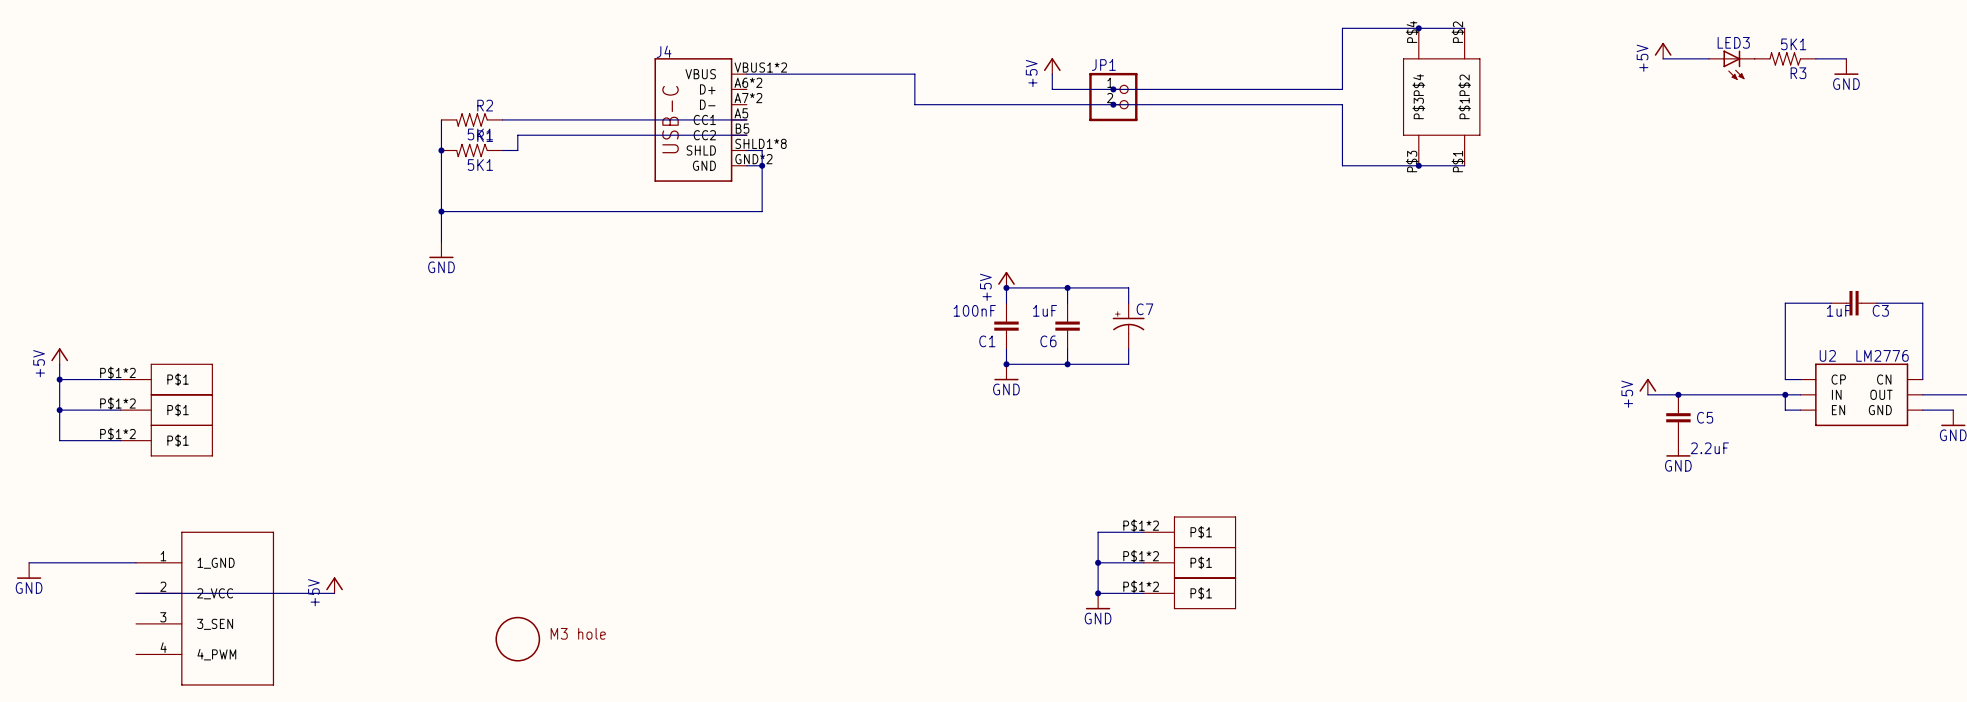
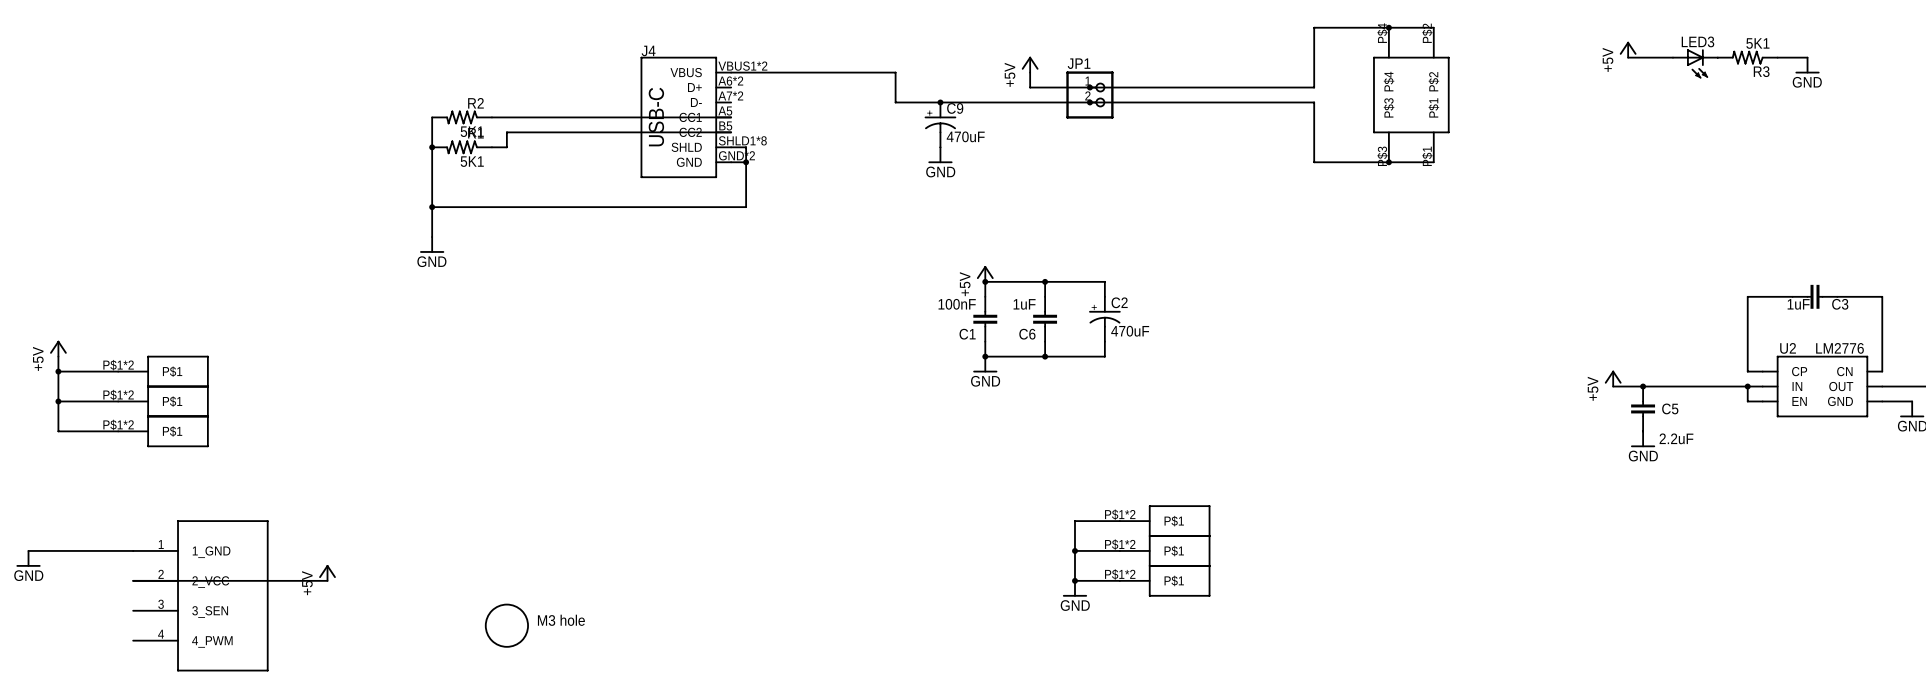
junction: none -> (940, 102)
C9: none -> 470uF (940, 124)
power symbol: none -> GND (940, 155)
C7 name: C7 (1144, 309) -> C2 (1119, 302)
C7 value: none -> 470uF (1130, 331)

